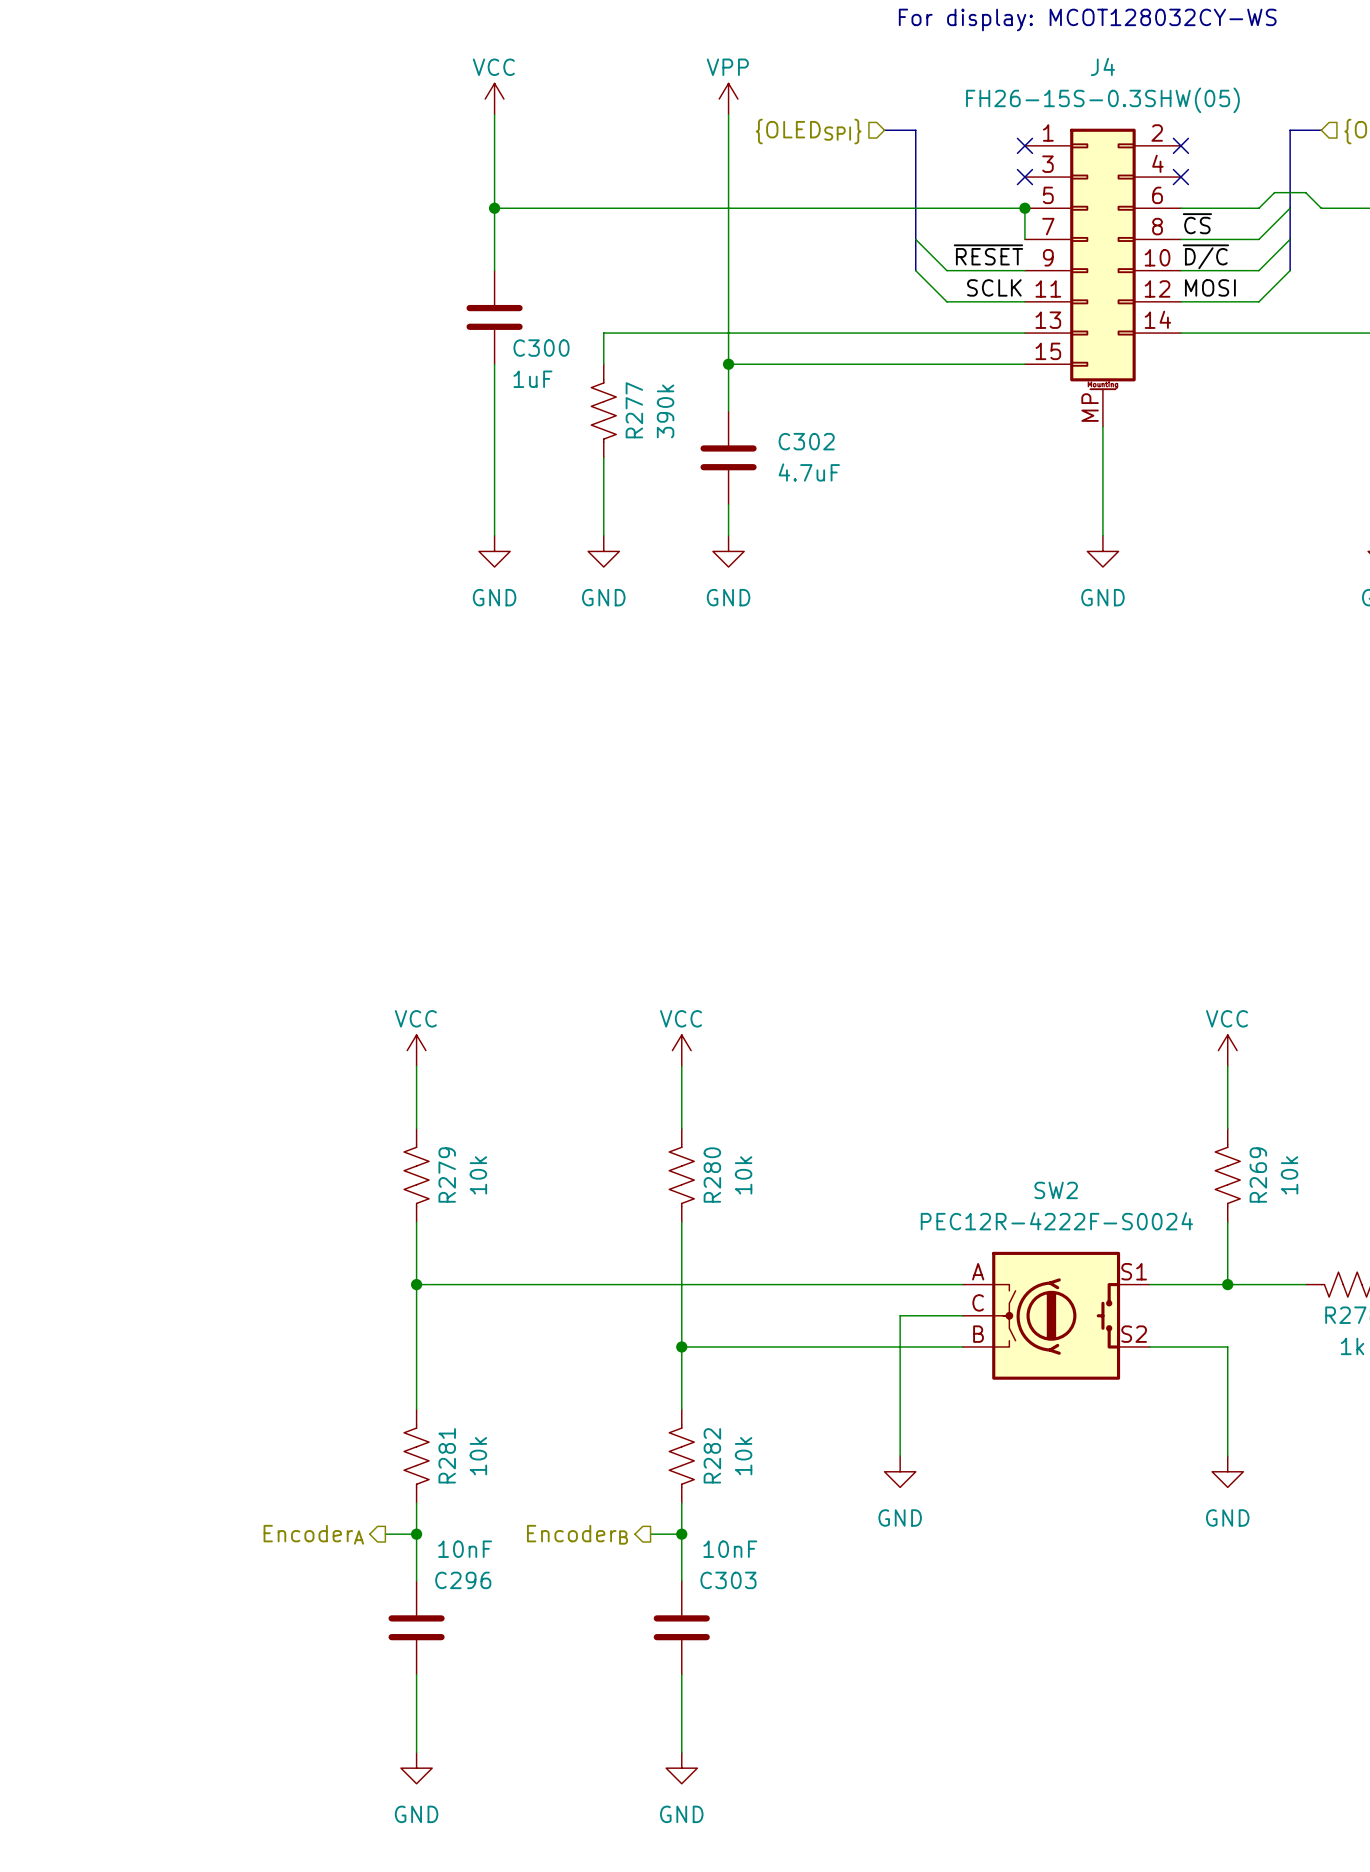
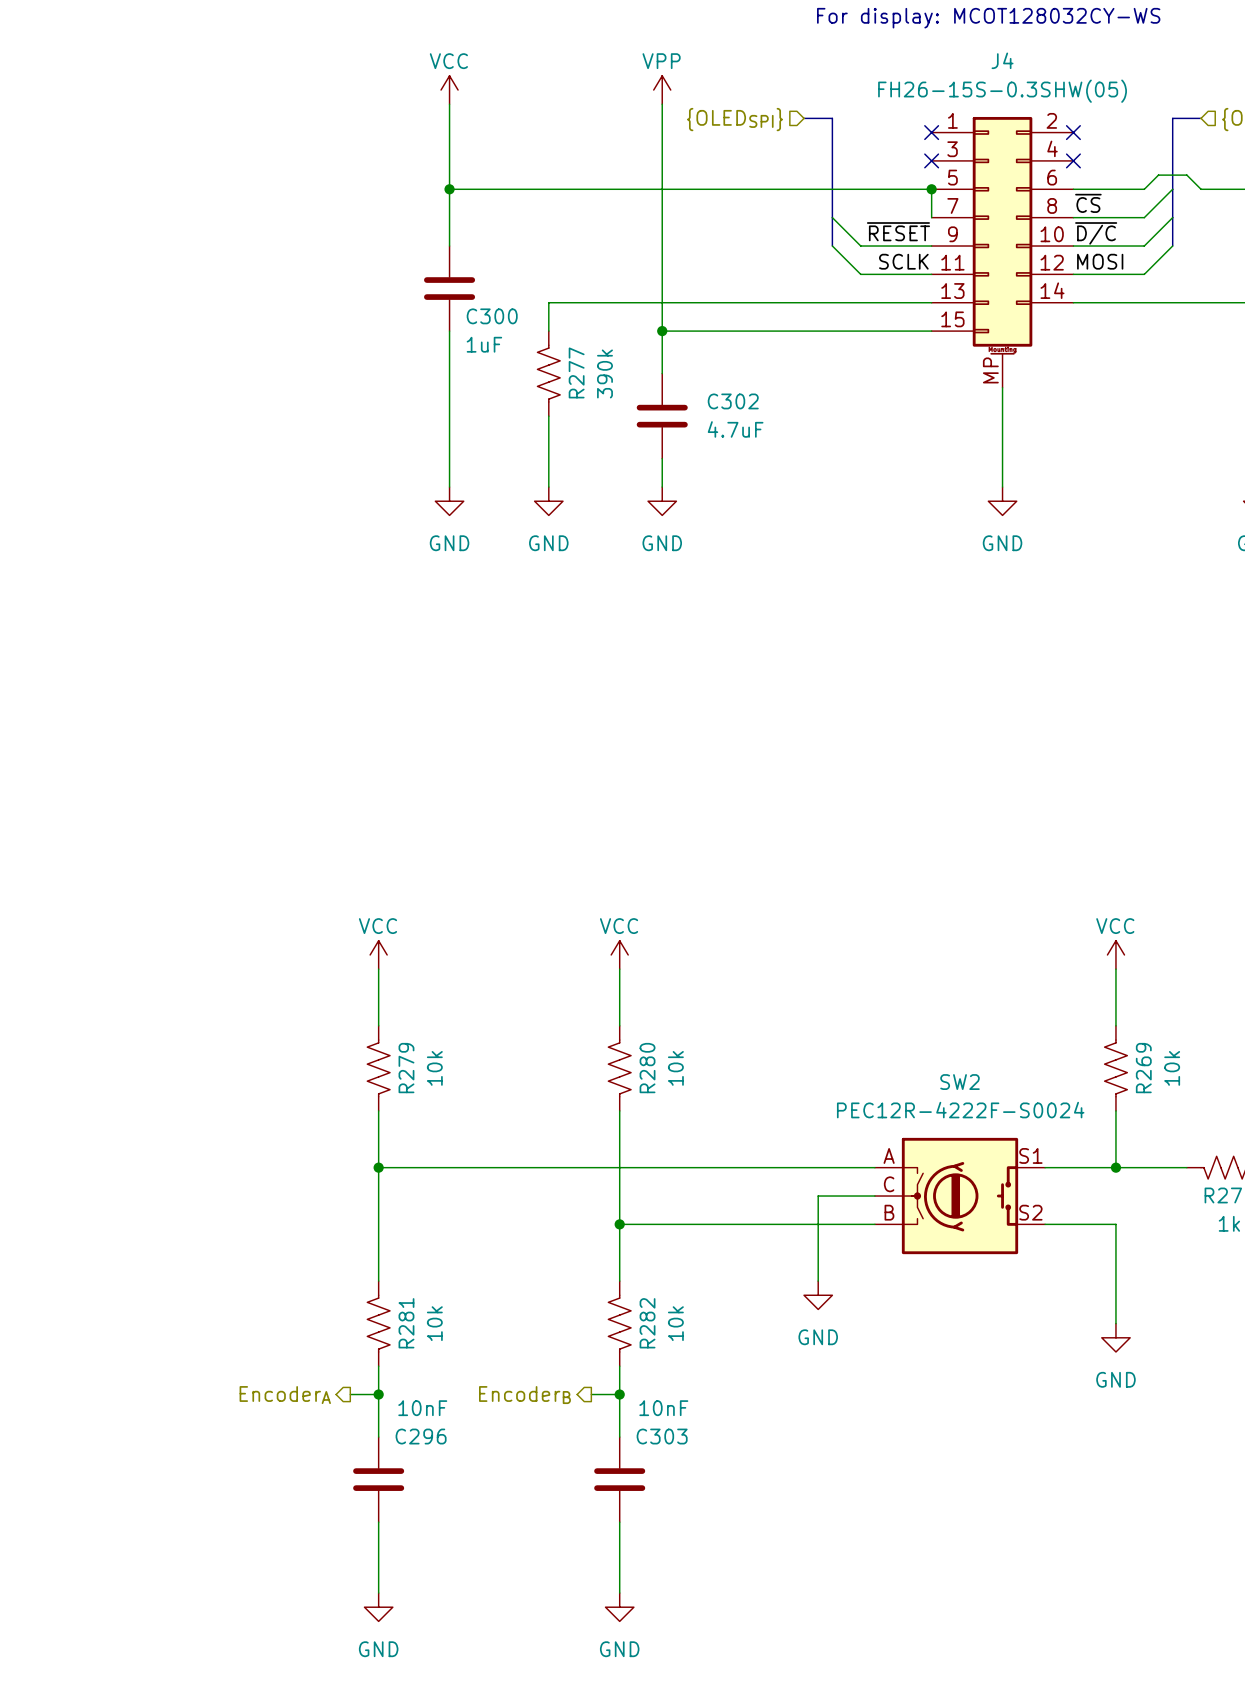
wire: (900, 1409) (900, 1456) -> none
power symbol position: GND (900, 1471) -> GND (818, 1295)

